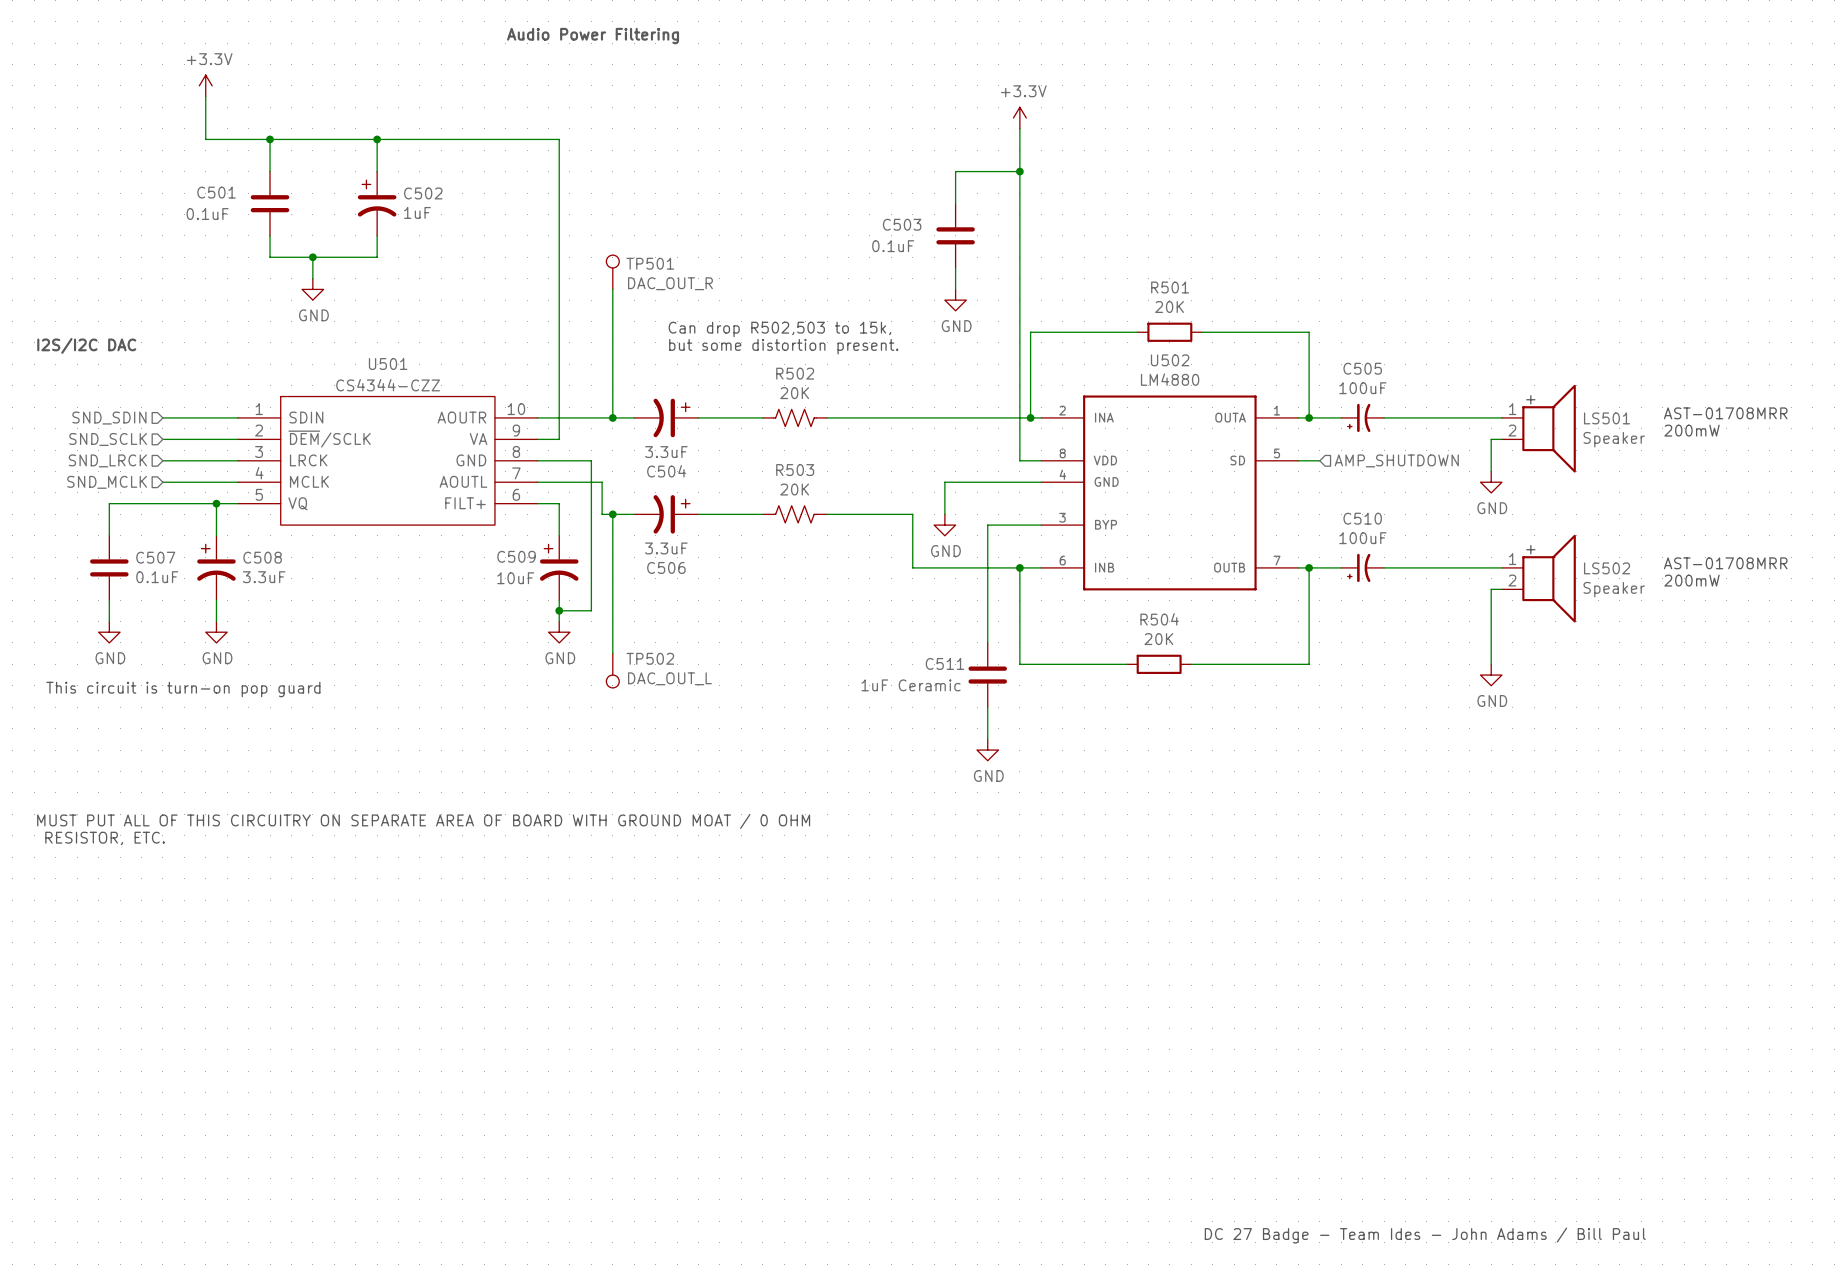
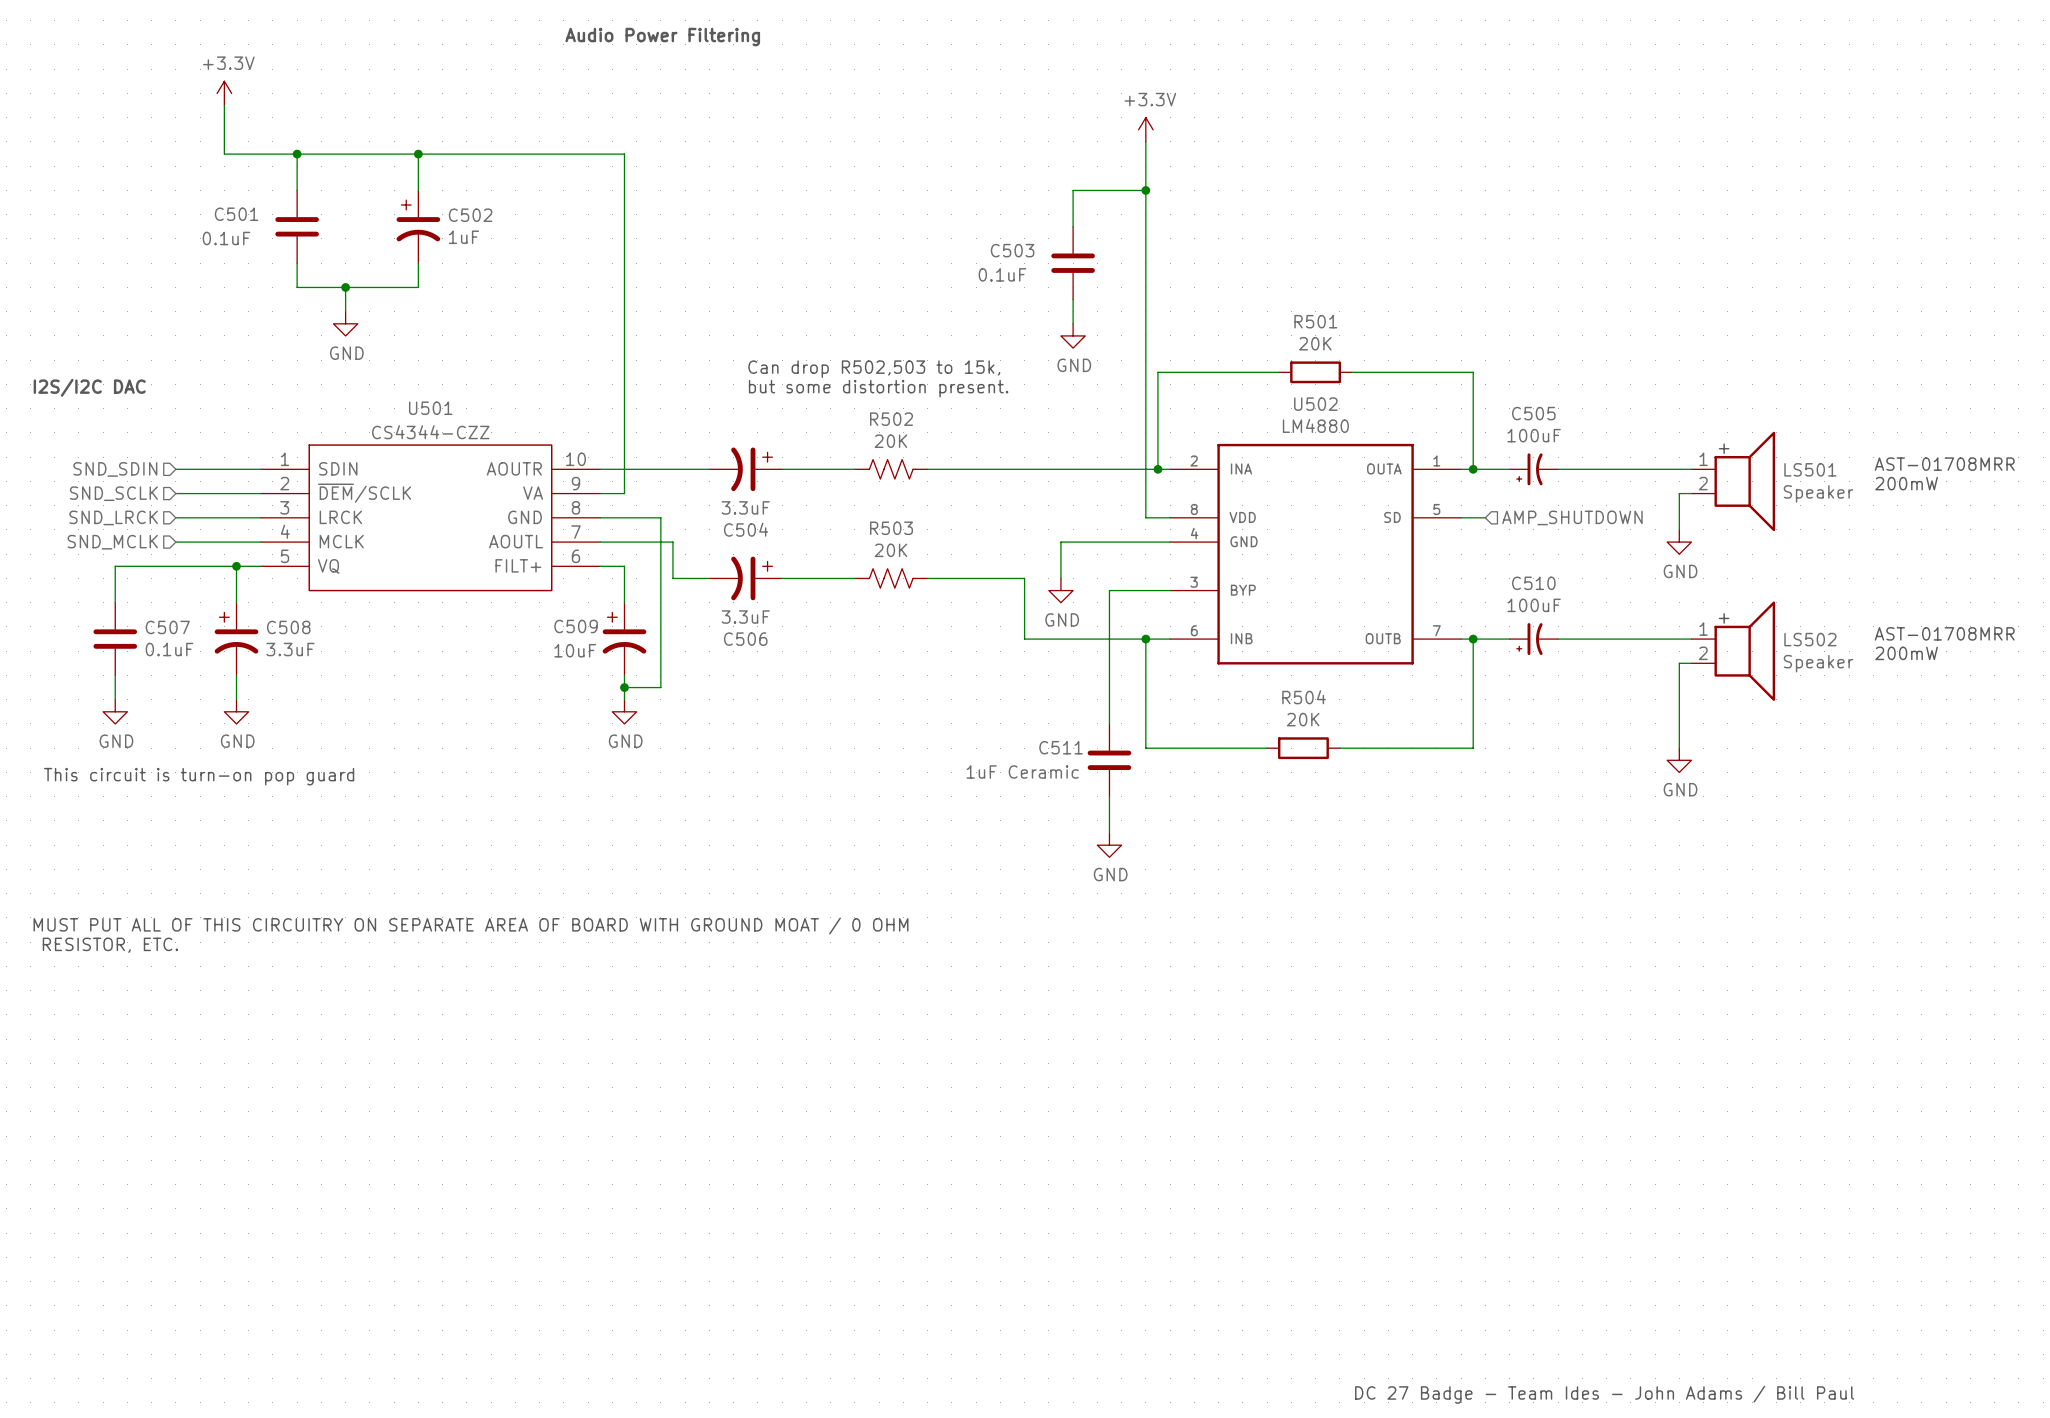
TP501: DAC_OUT_R (612, 272) -> none
wire: (612, 289) (612, 417) -> none
junction: (612, 417) -> none
wire: (612, 514) (612, 653) -> none
junction: (612, 514) -> none
TP502: DAC_OUT_L (612, 670) -> none

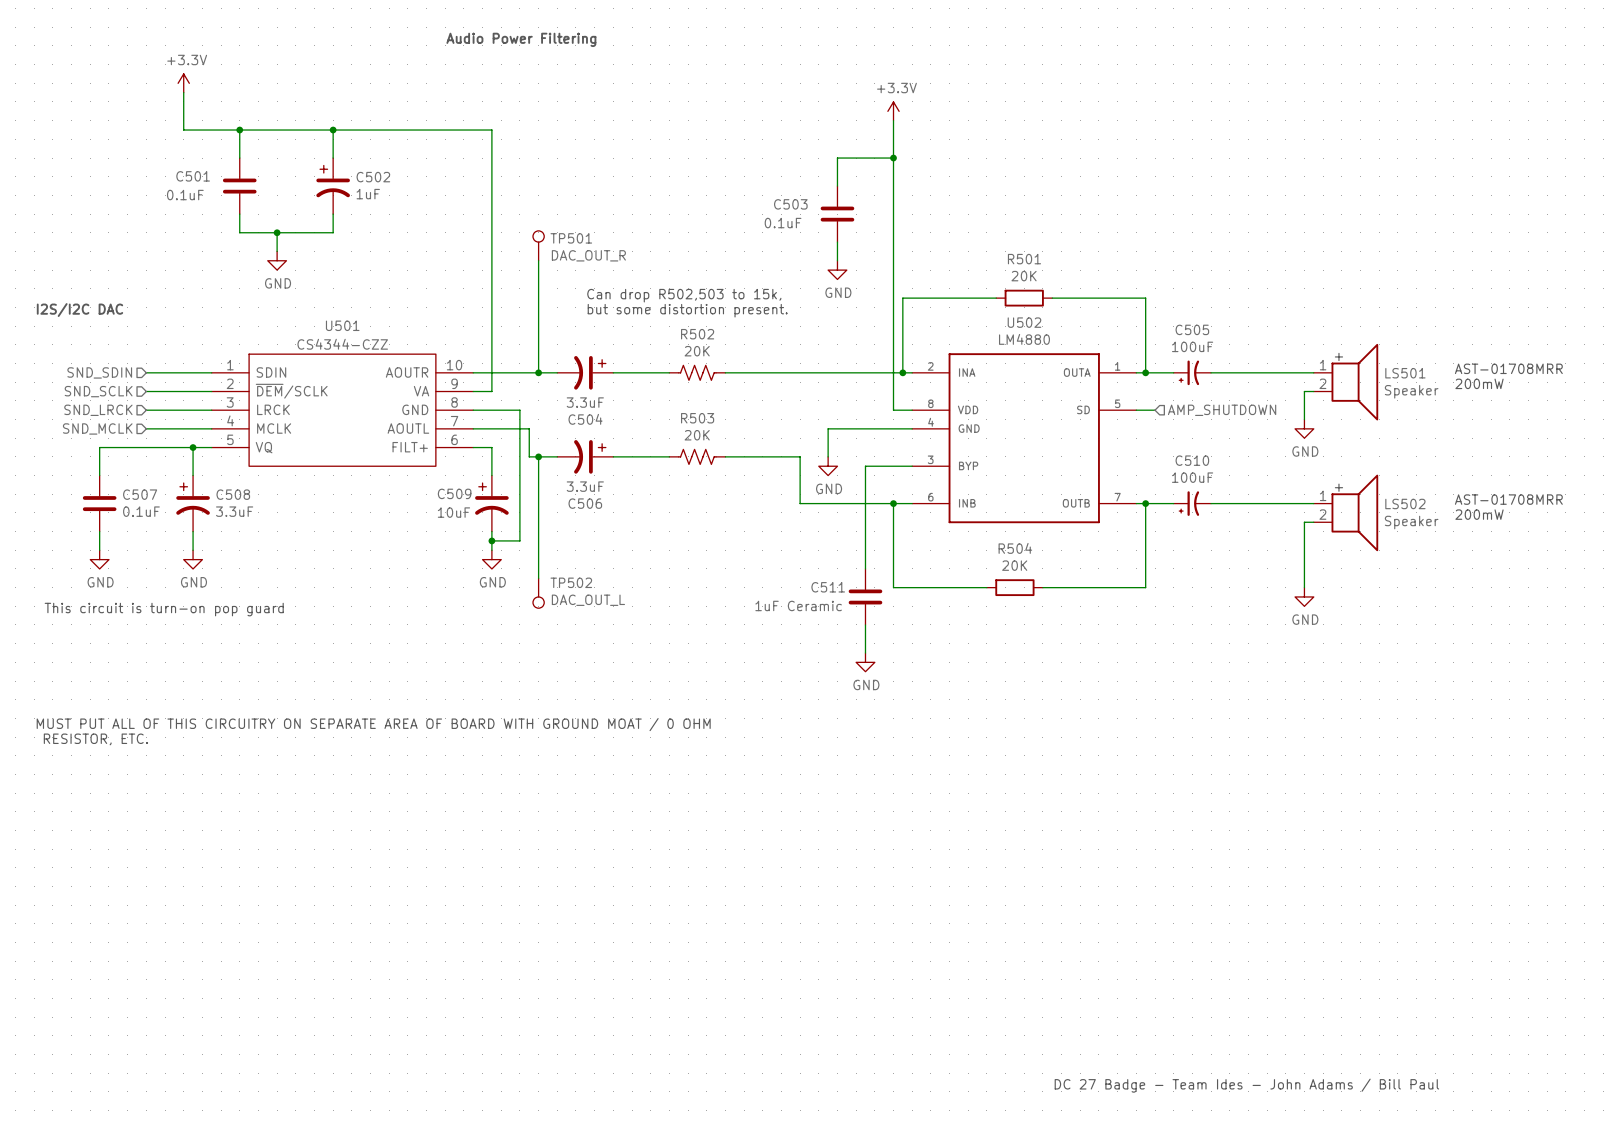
TP501: none -> DAC_OUT_R (538, 245)
wire: none -> (538, 260) (538, 372)
junction: none -> (538, 372)
wire: none -> (538, 456) (538, 578)
junction: none -> (538, 456)
TP502: none -> DAC_OUT_L (538, 593)

